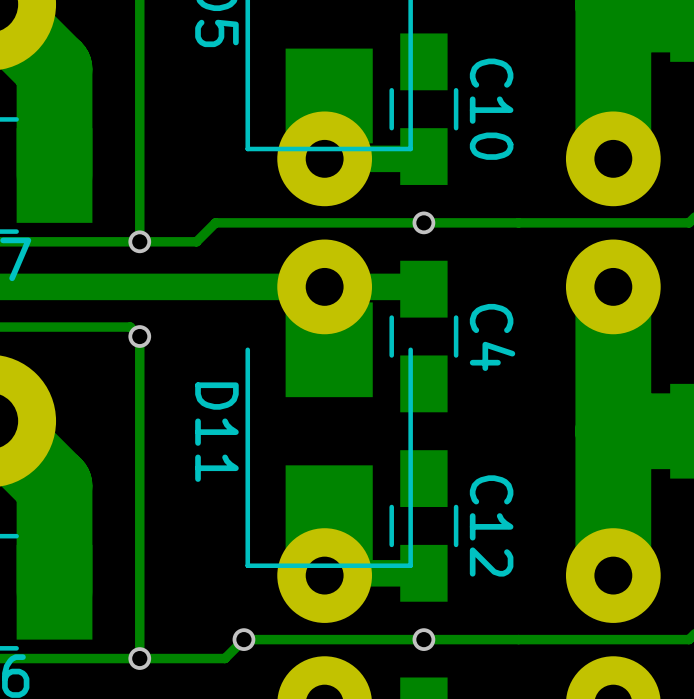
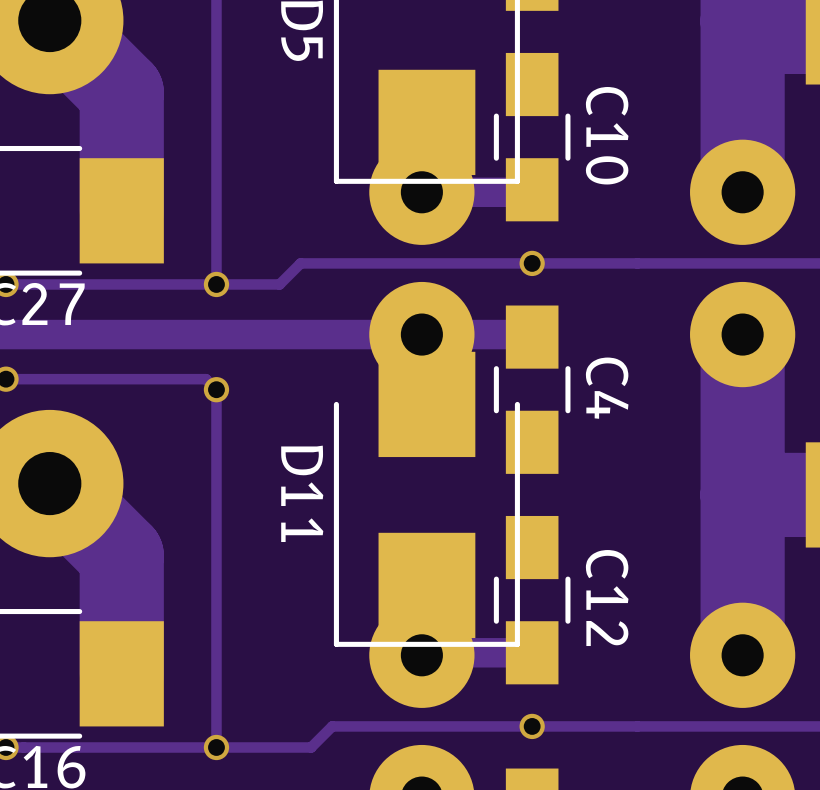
via: (243, 639) -> none

